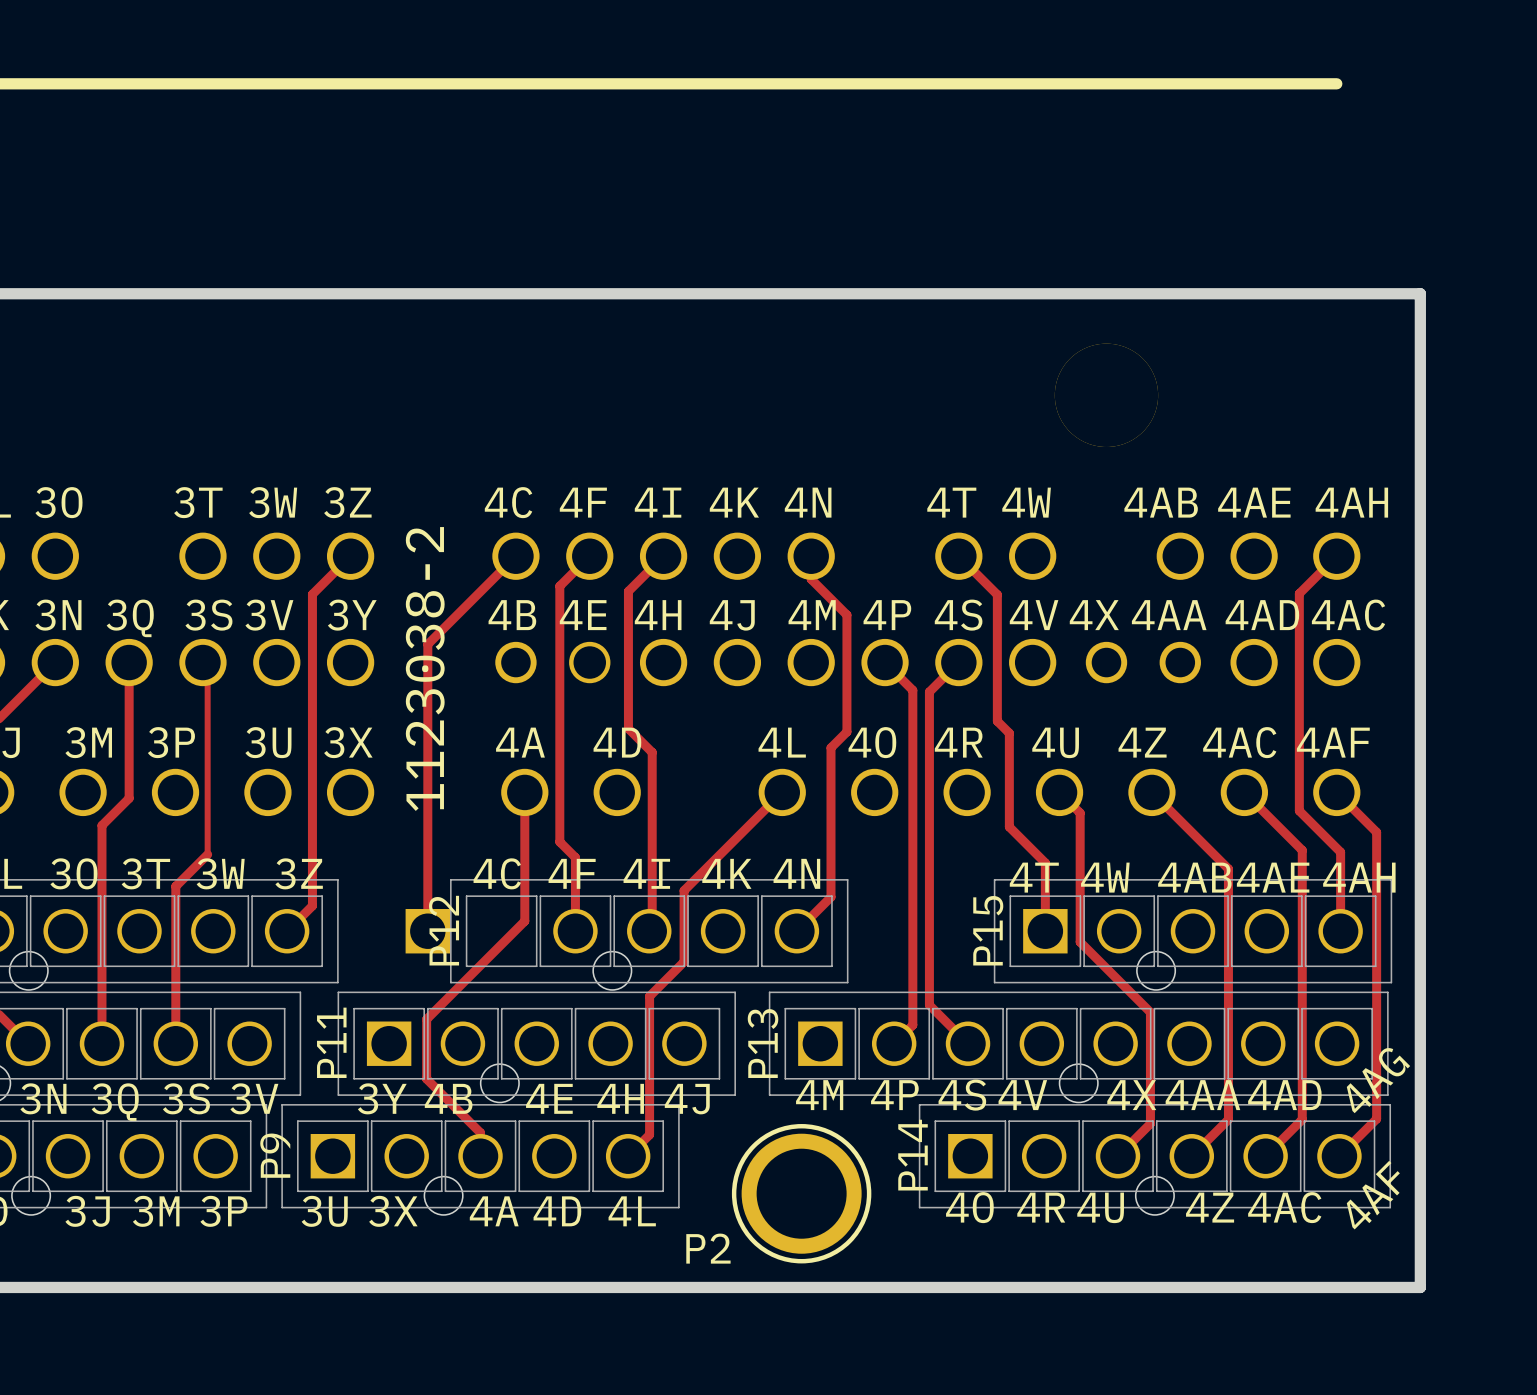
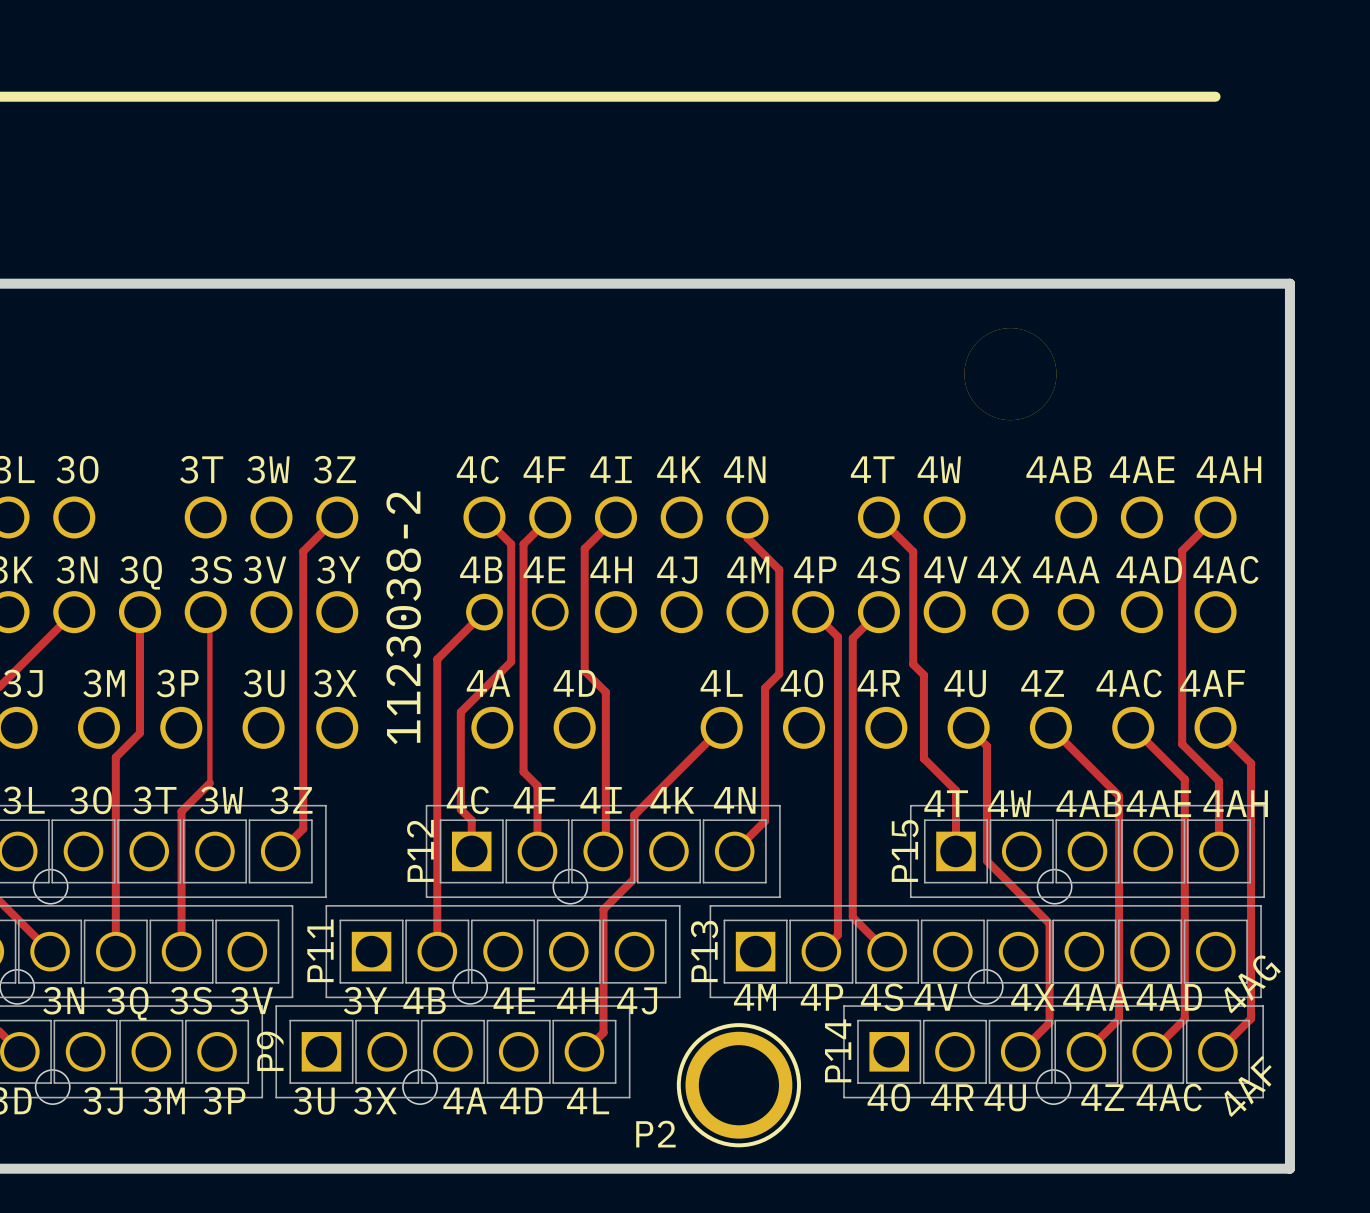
track: (515, 556) (427, 644) (427, 931) -> (484, 517) (511, 544) (511, 661) (460, 712) (460, 809) (471, 820) (471, 851)
track: none -> (484, 612) (437, 659) (437, 951)
track: (524, 792) (524, 921) (426, 1019) (426, 1078) (480, 1132) (480, 1156) -> none
P12 footprint: [405, 879, 849, 990] -> [425, 805, 781, 904]

